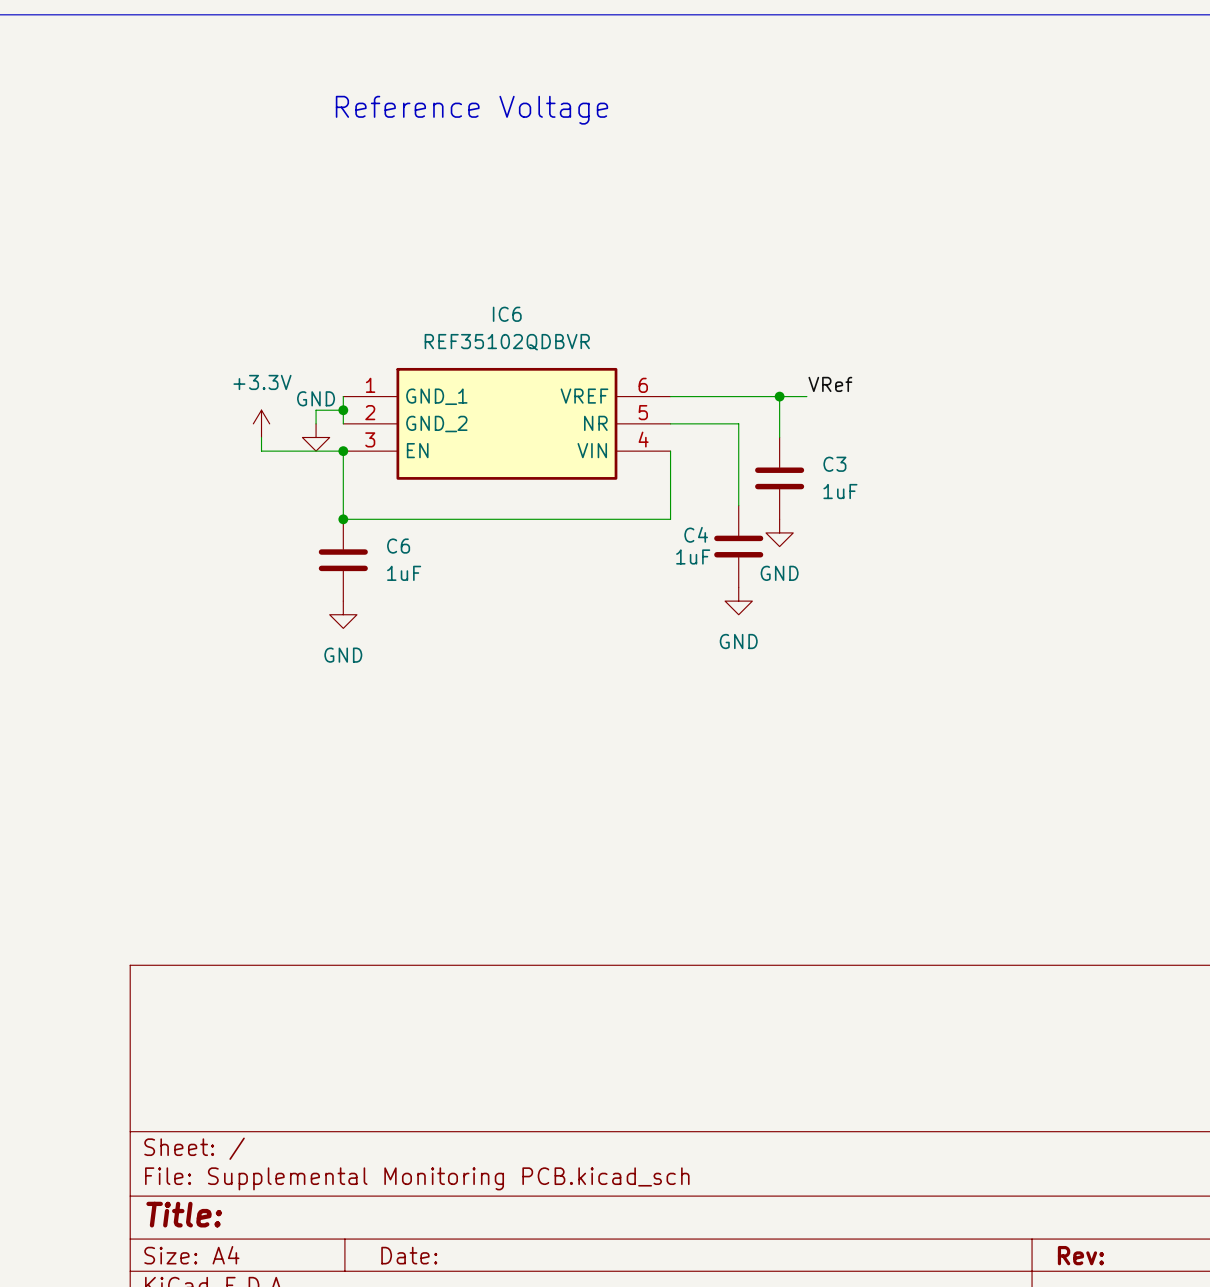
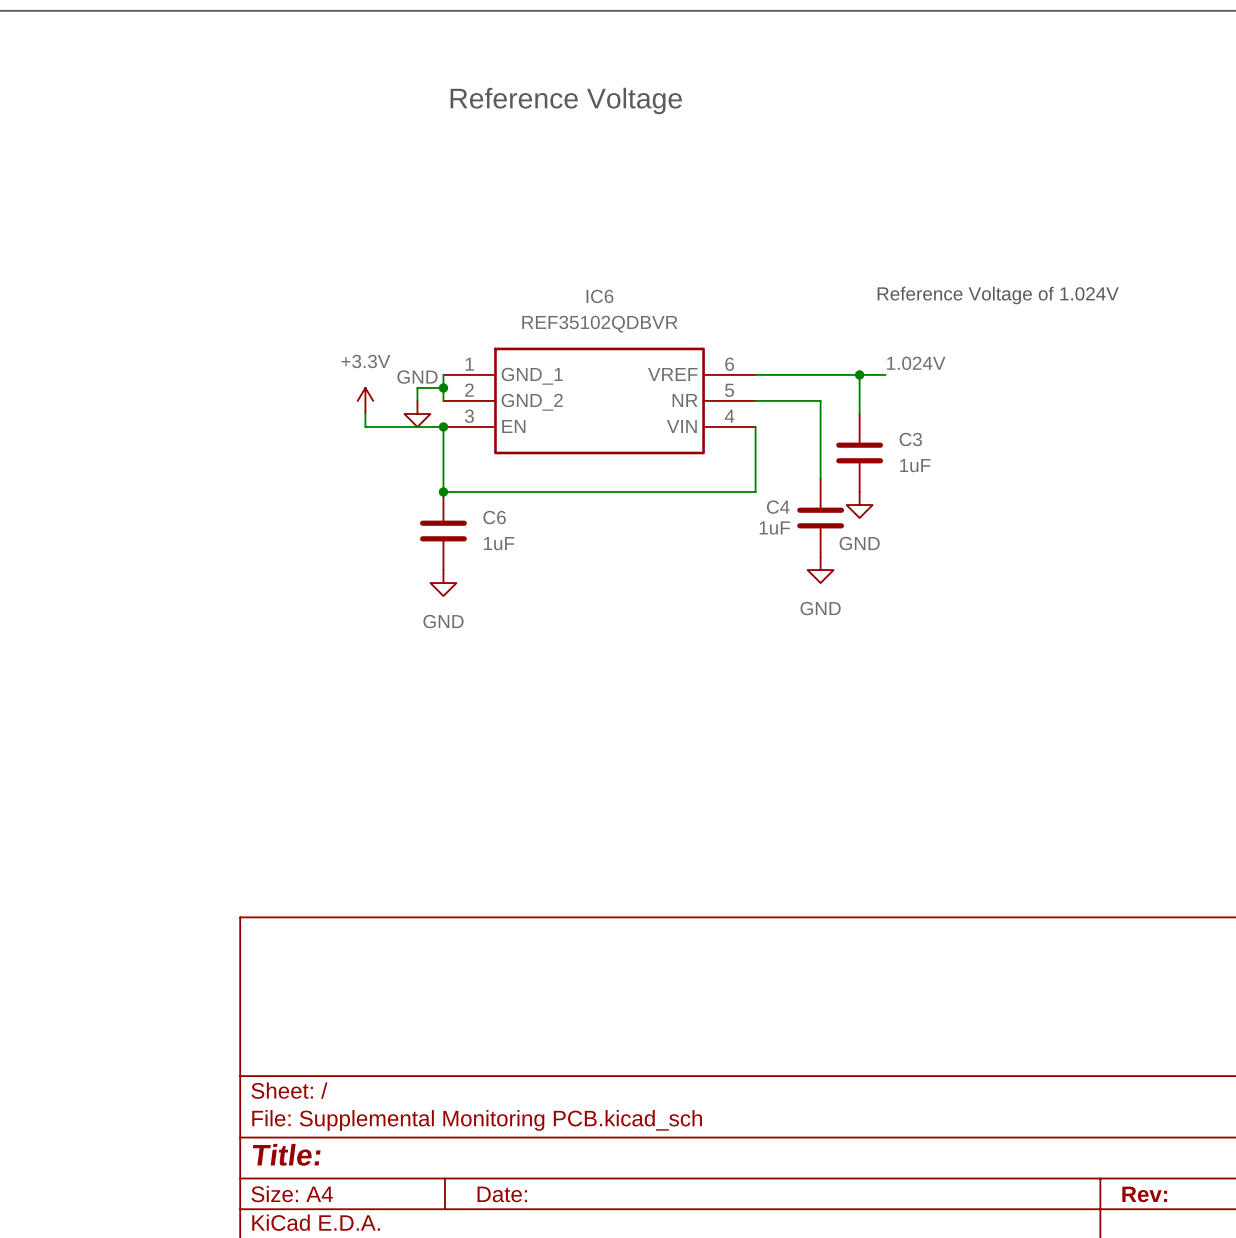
text: none -> Reference Voltage of 1.024V (998, 295)
label: VRef (830, 384) -> 1.024V (916, 363)

